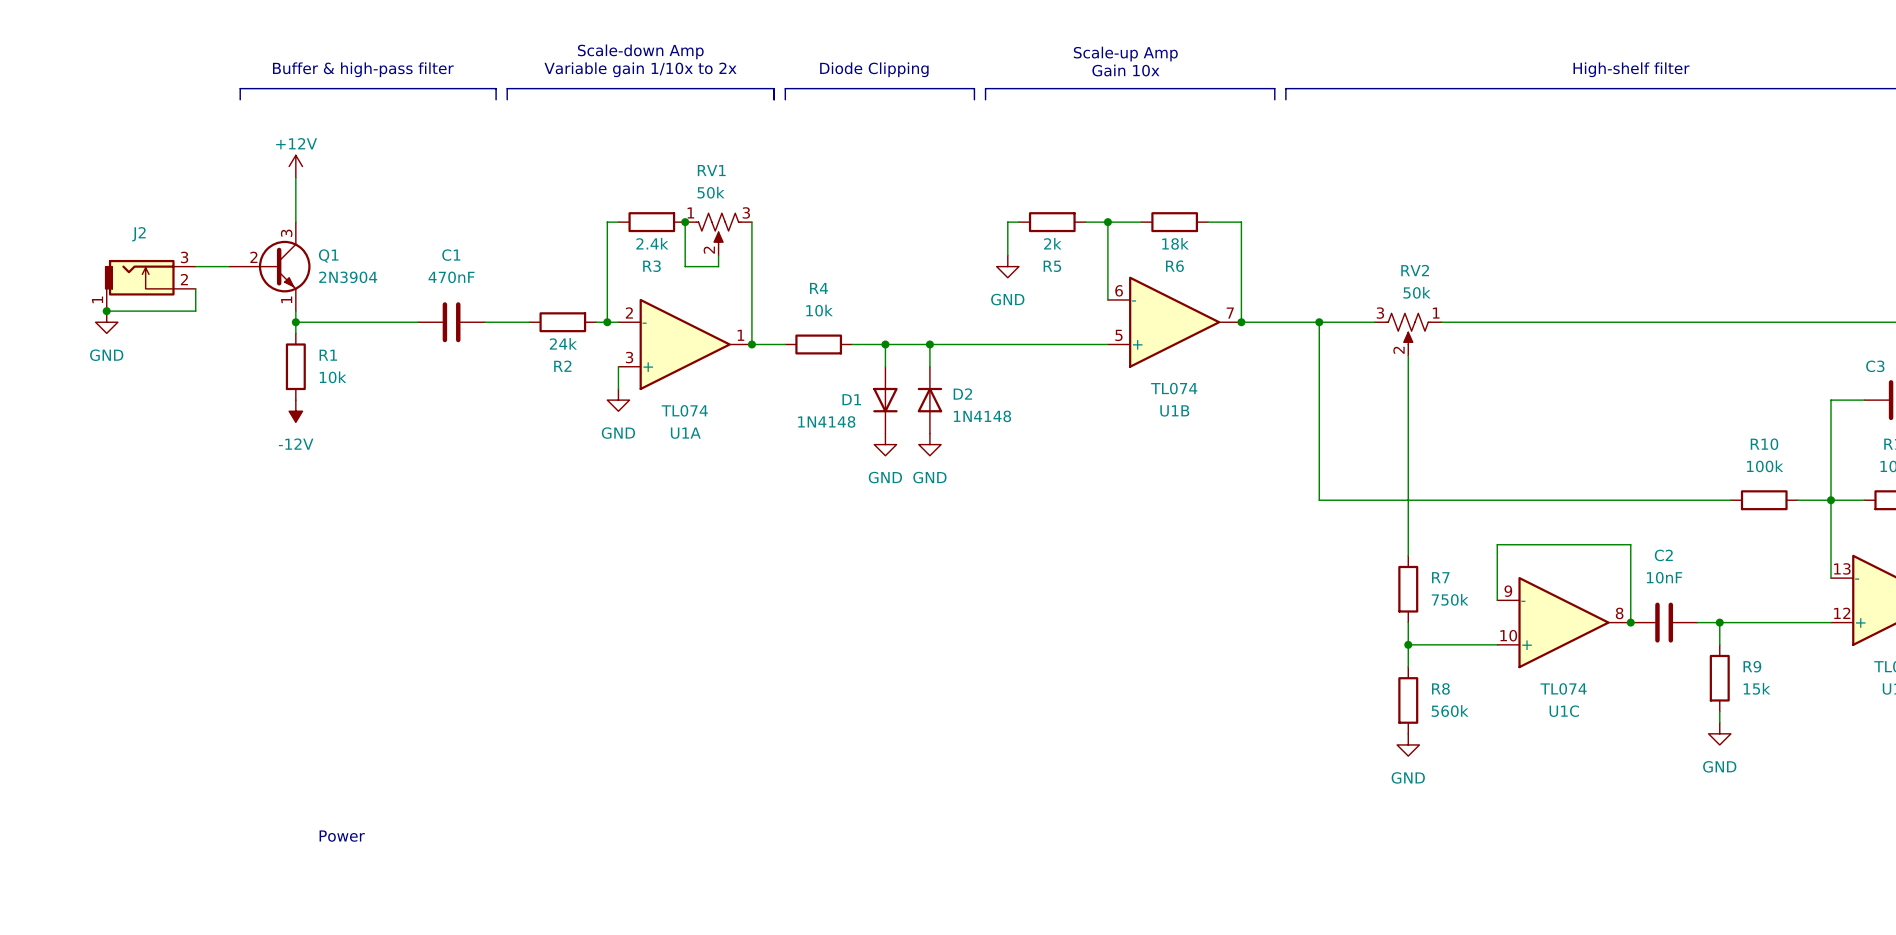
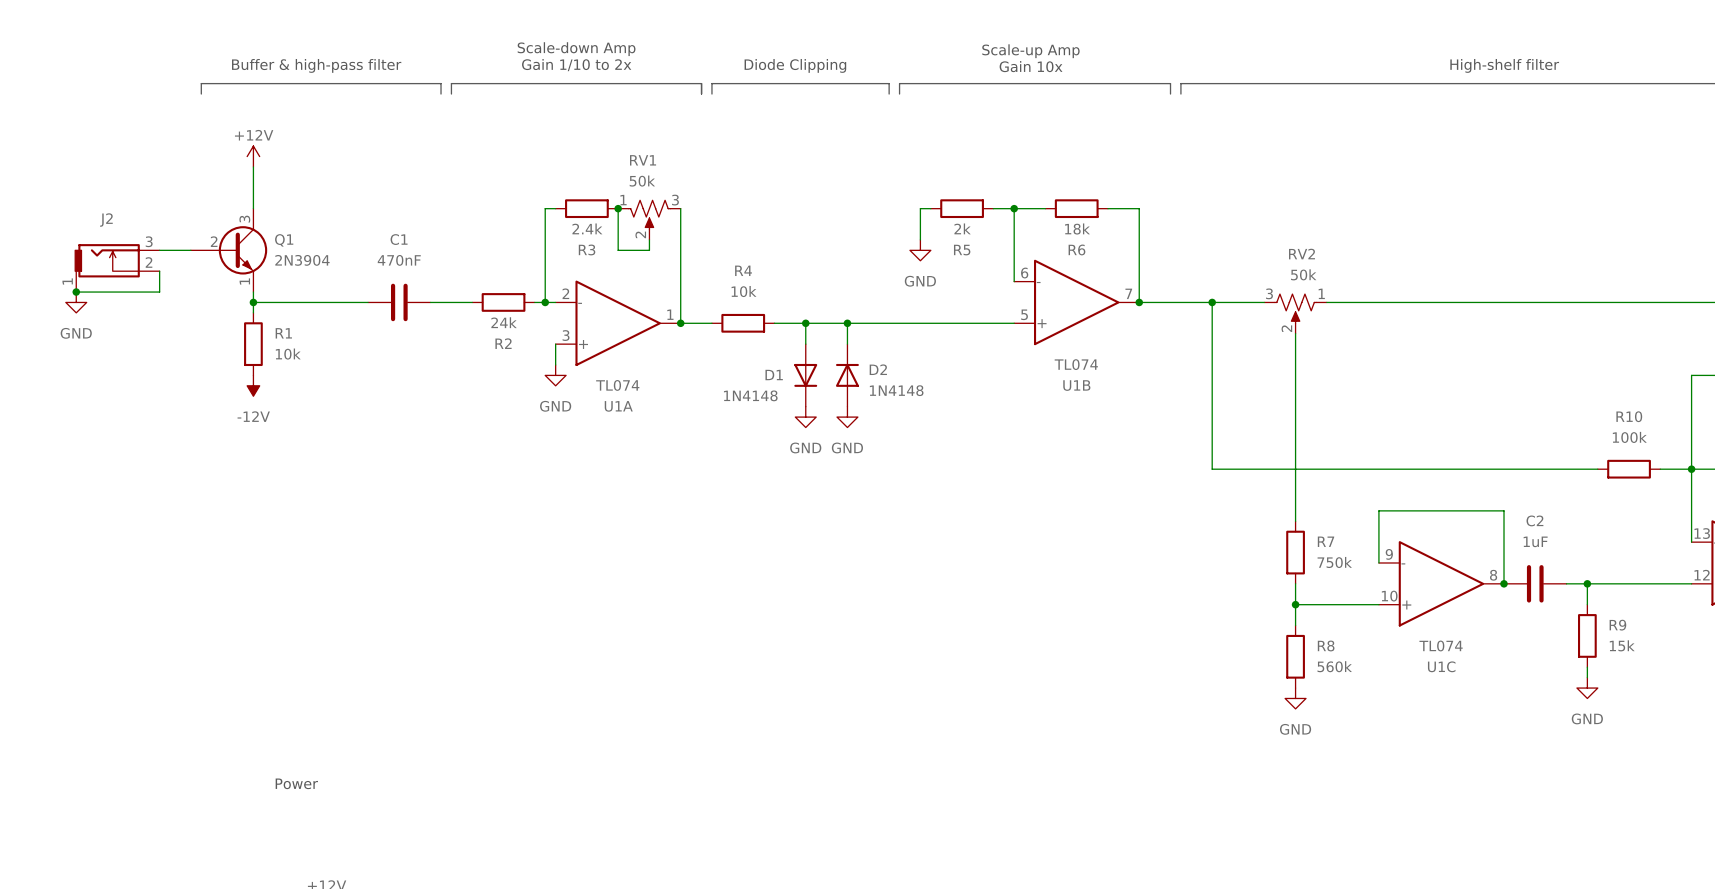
text: Variable gain 1/10x to 2x (640, 69) -> Gain 1/10 to 2x (576, 65)
C2 value: 10nF (1664, 577) -> 1uF (1535, 541)

